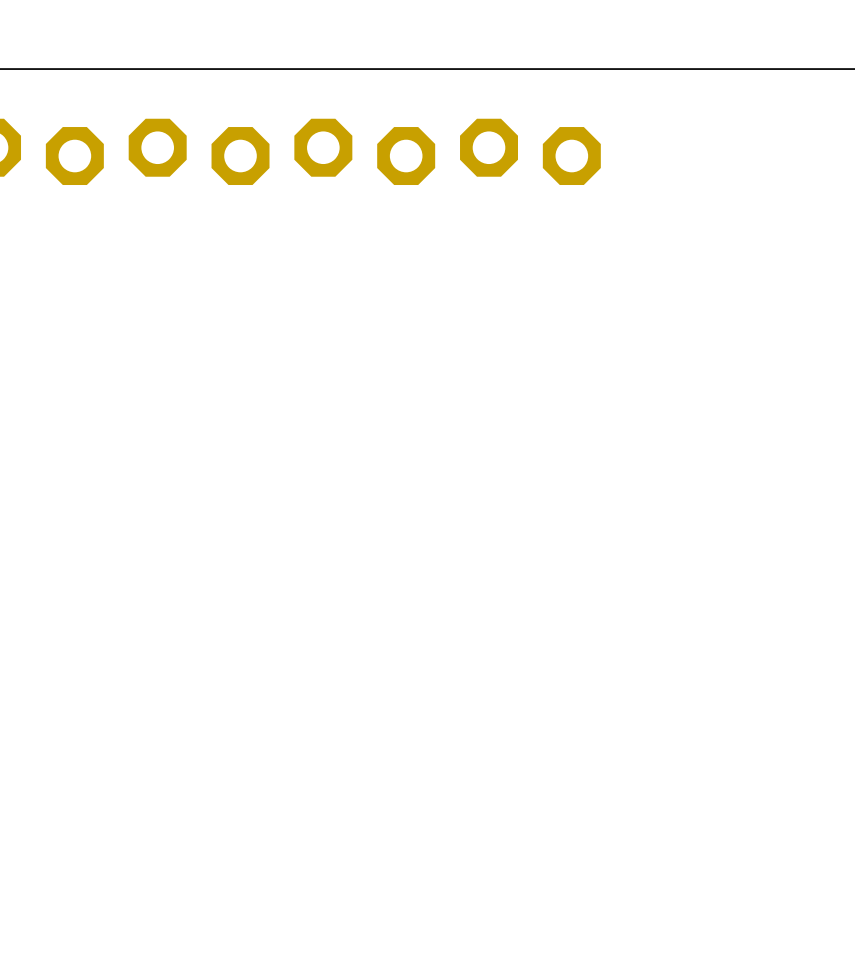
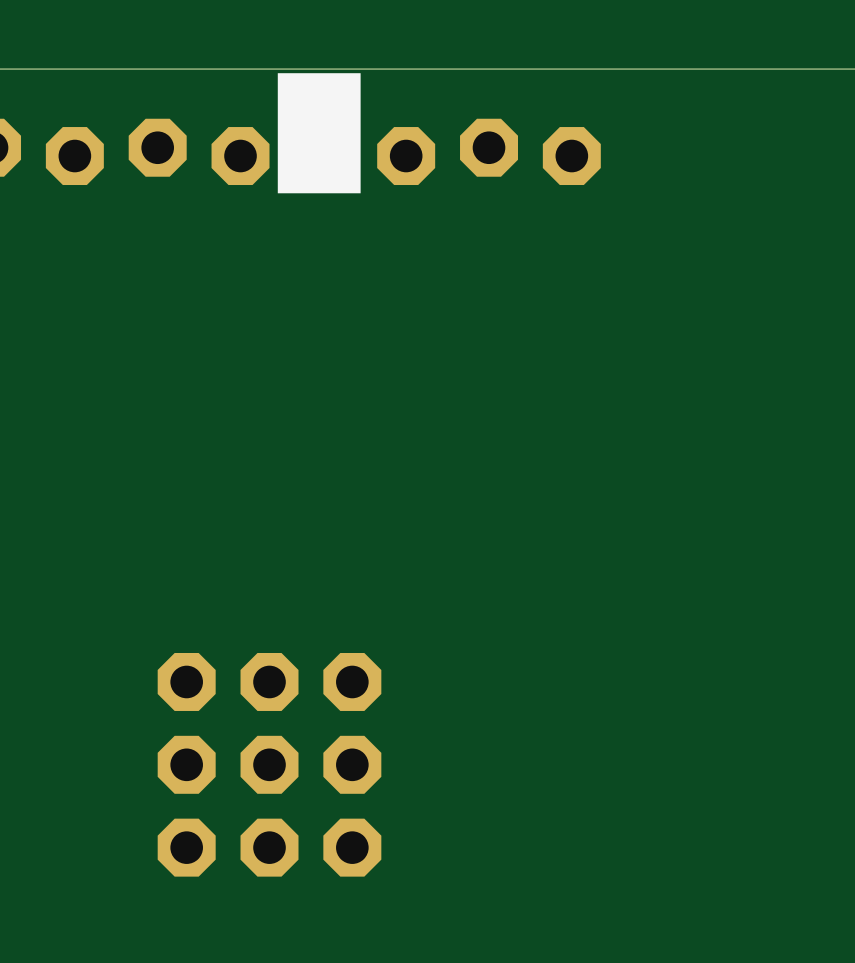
drawing: none -> [277, 73, 361, 194]
part: none -> (186, 764)
part: none -> (269, 764)
part: none -> (352, 764)

